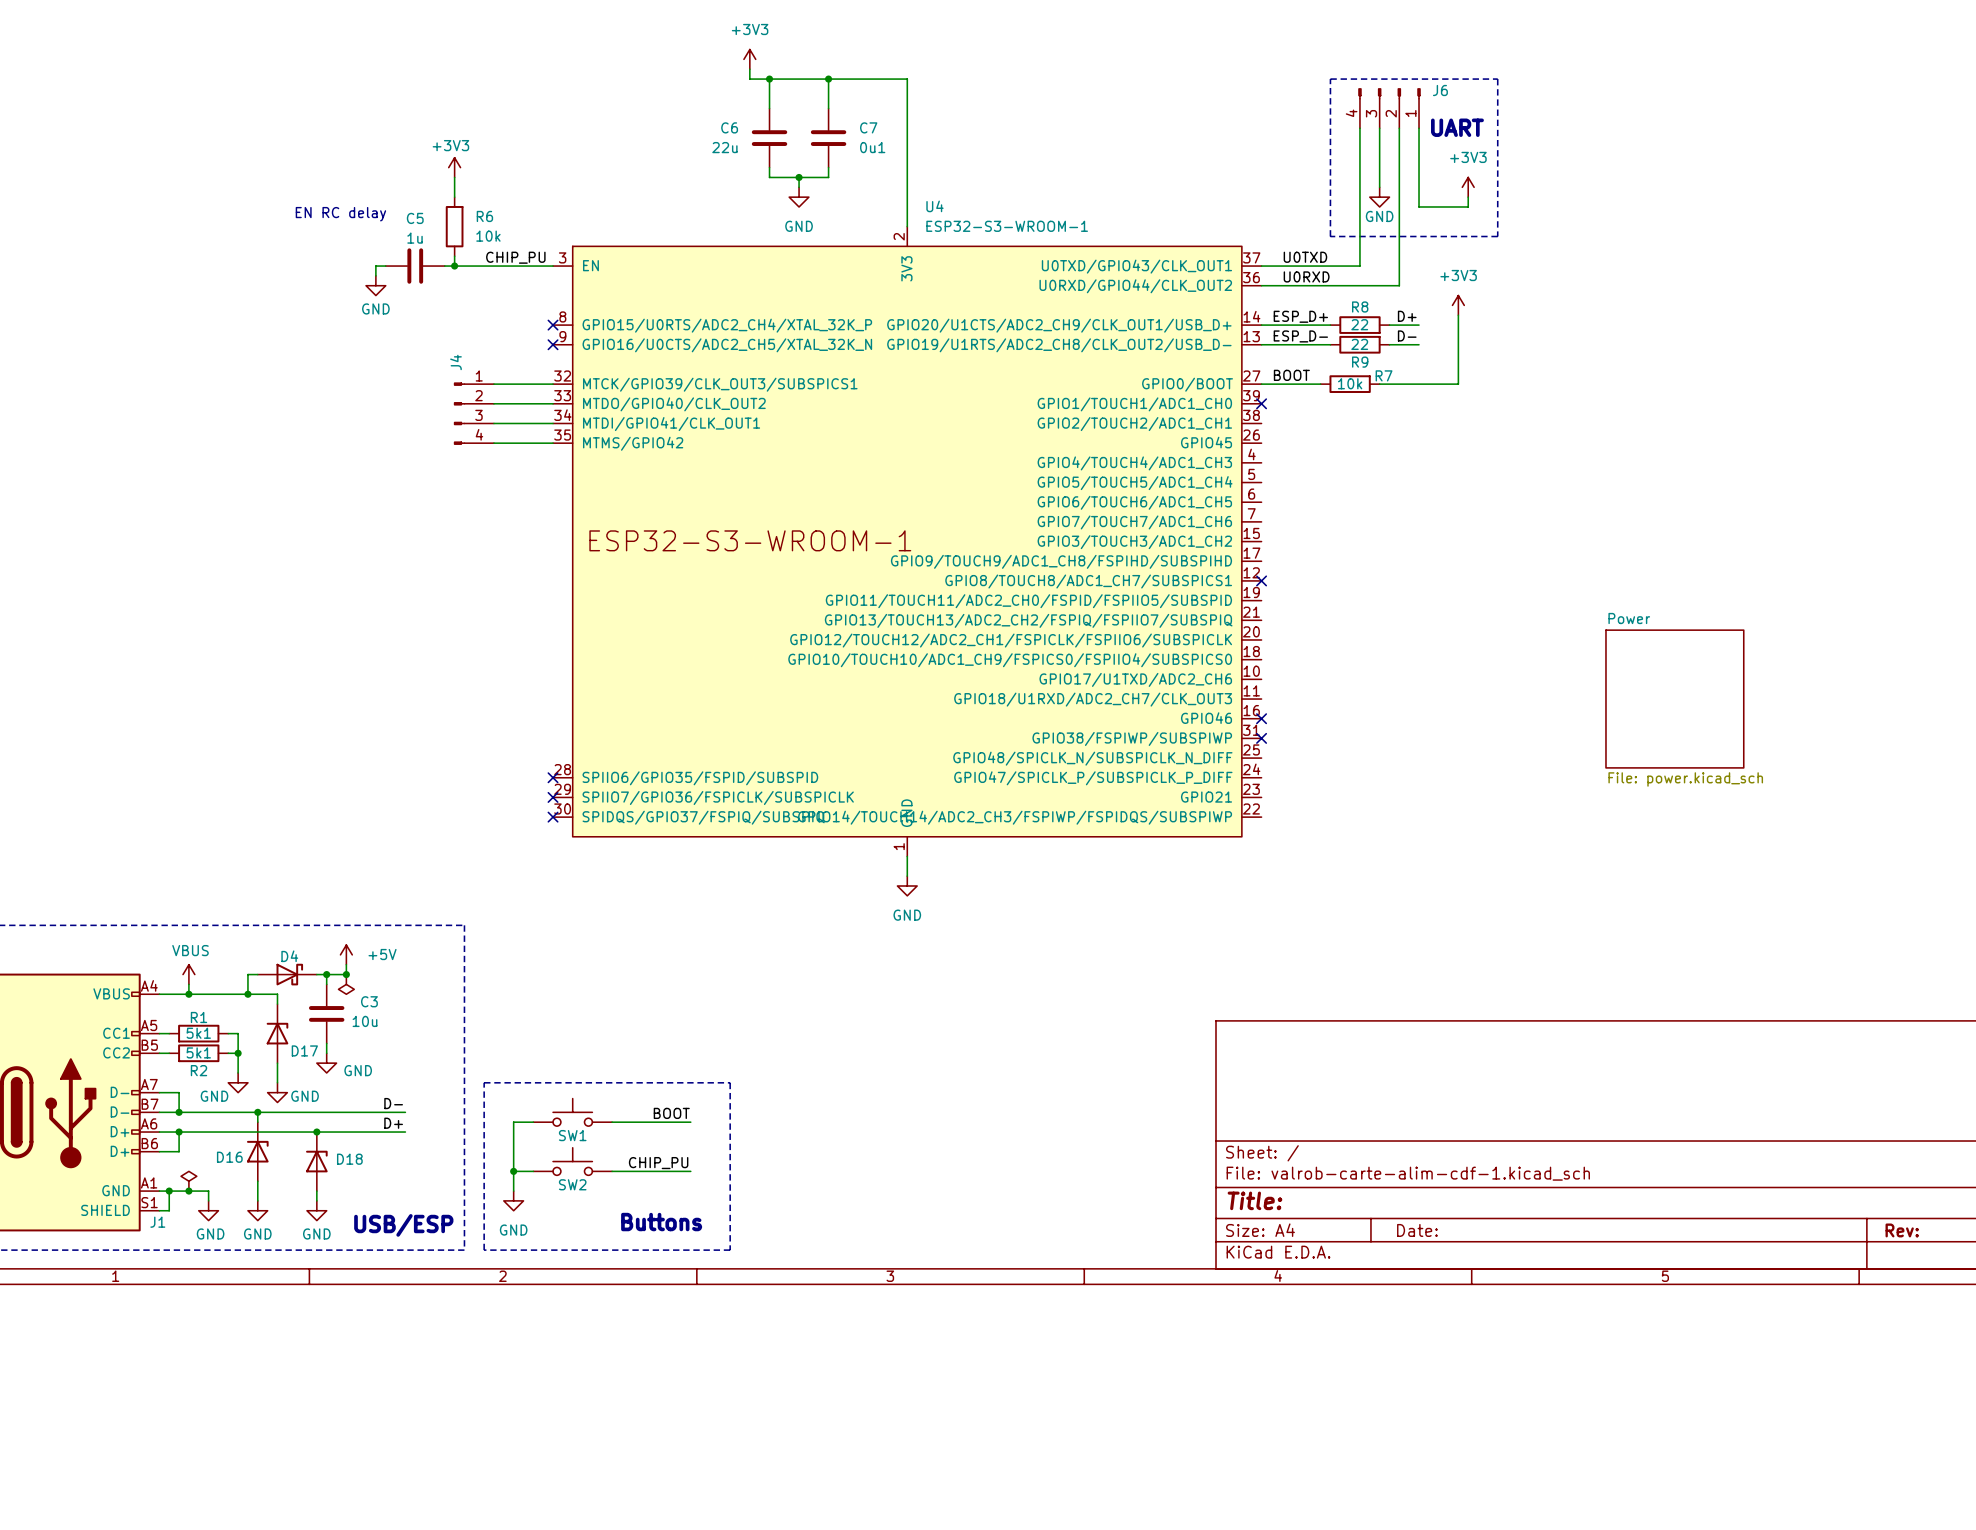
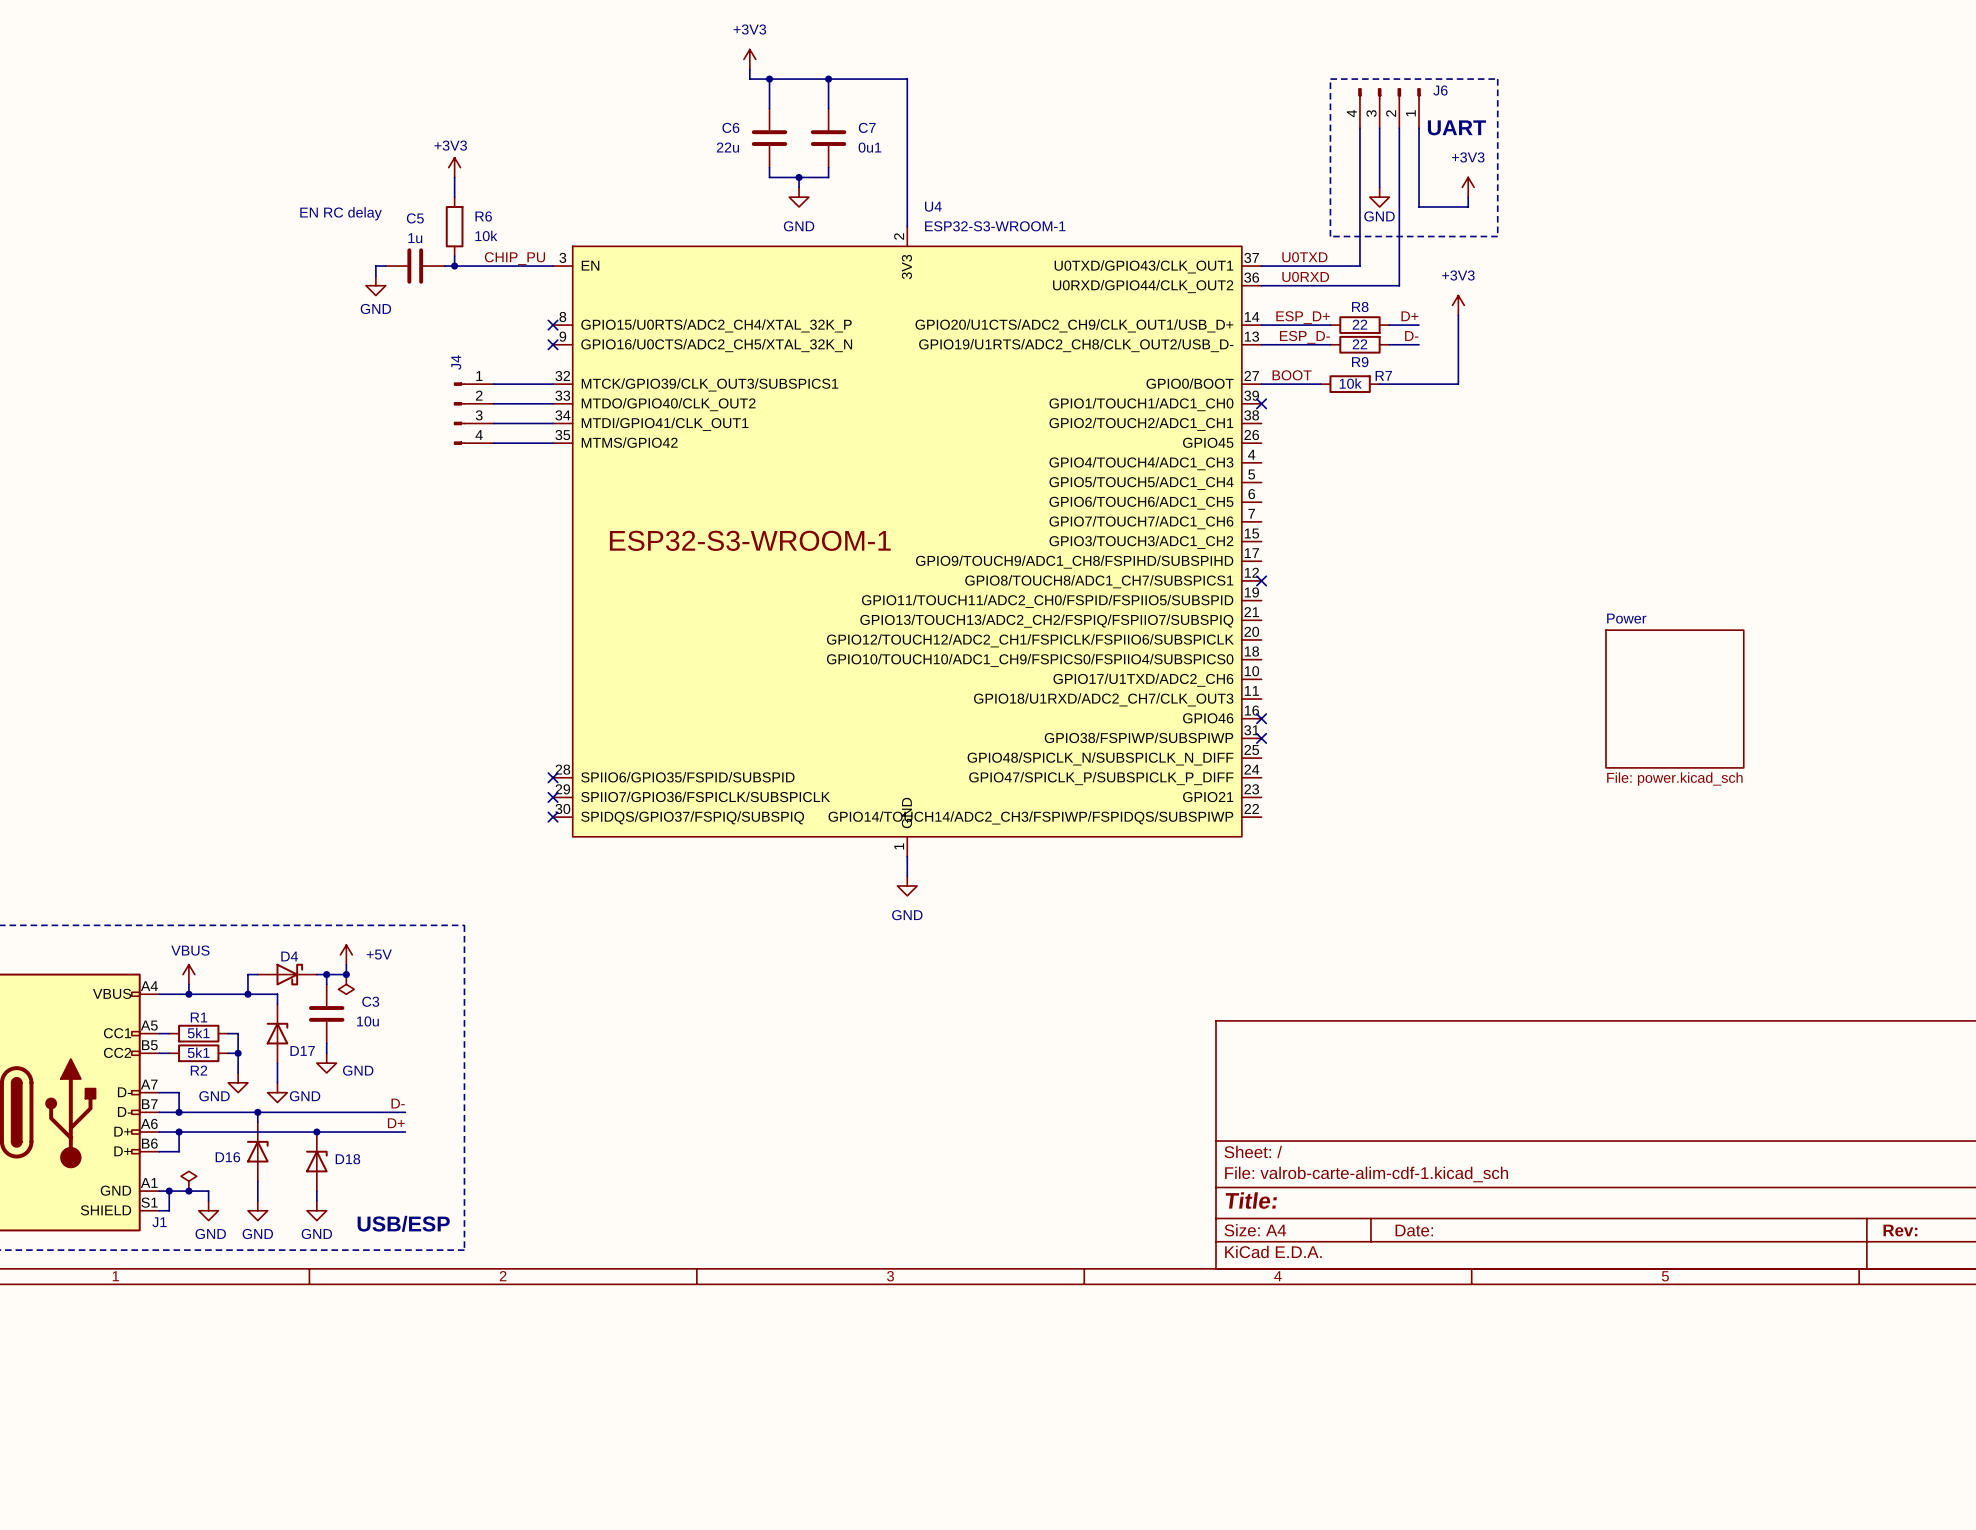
line: (484, 1082) (730, 1082) (730, 1250) (484, 1250) (484, 1082) -> none
SW1: (572, 1112) -> none
label: BOOT (671, 1113) -> none
wire: (533, 1122) (513, 1122) (513, 1191) -> none
wire: (612, 1122) (690, 1122) -> none
SW2: (572, 1161) -> none
label: CHIP_PU (658, 1163) -> none
wire: (513, 1171) (533, 1171) -> none
junction: (513, 1171) -> none
wire: (612, 1171) (690, 1171) -> none
power symbol: GND (513, 1200) -> none
text: Buttons (661, 1222) -> none

